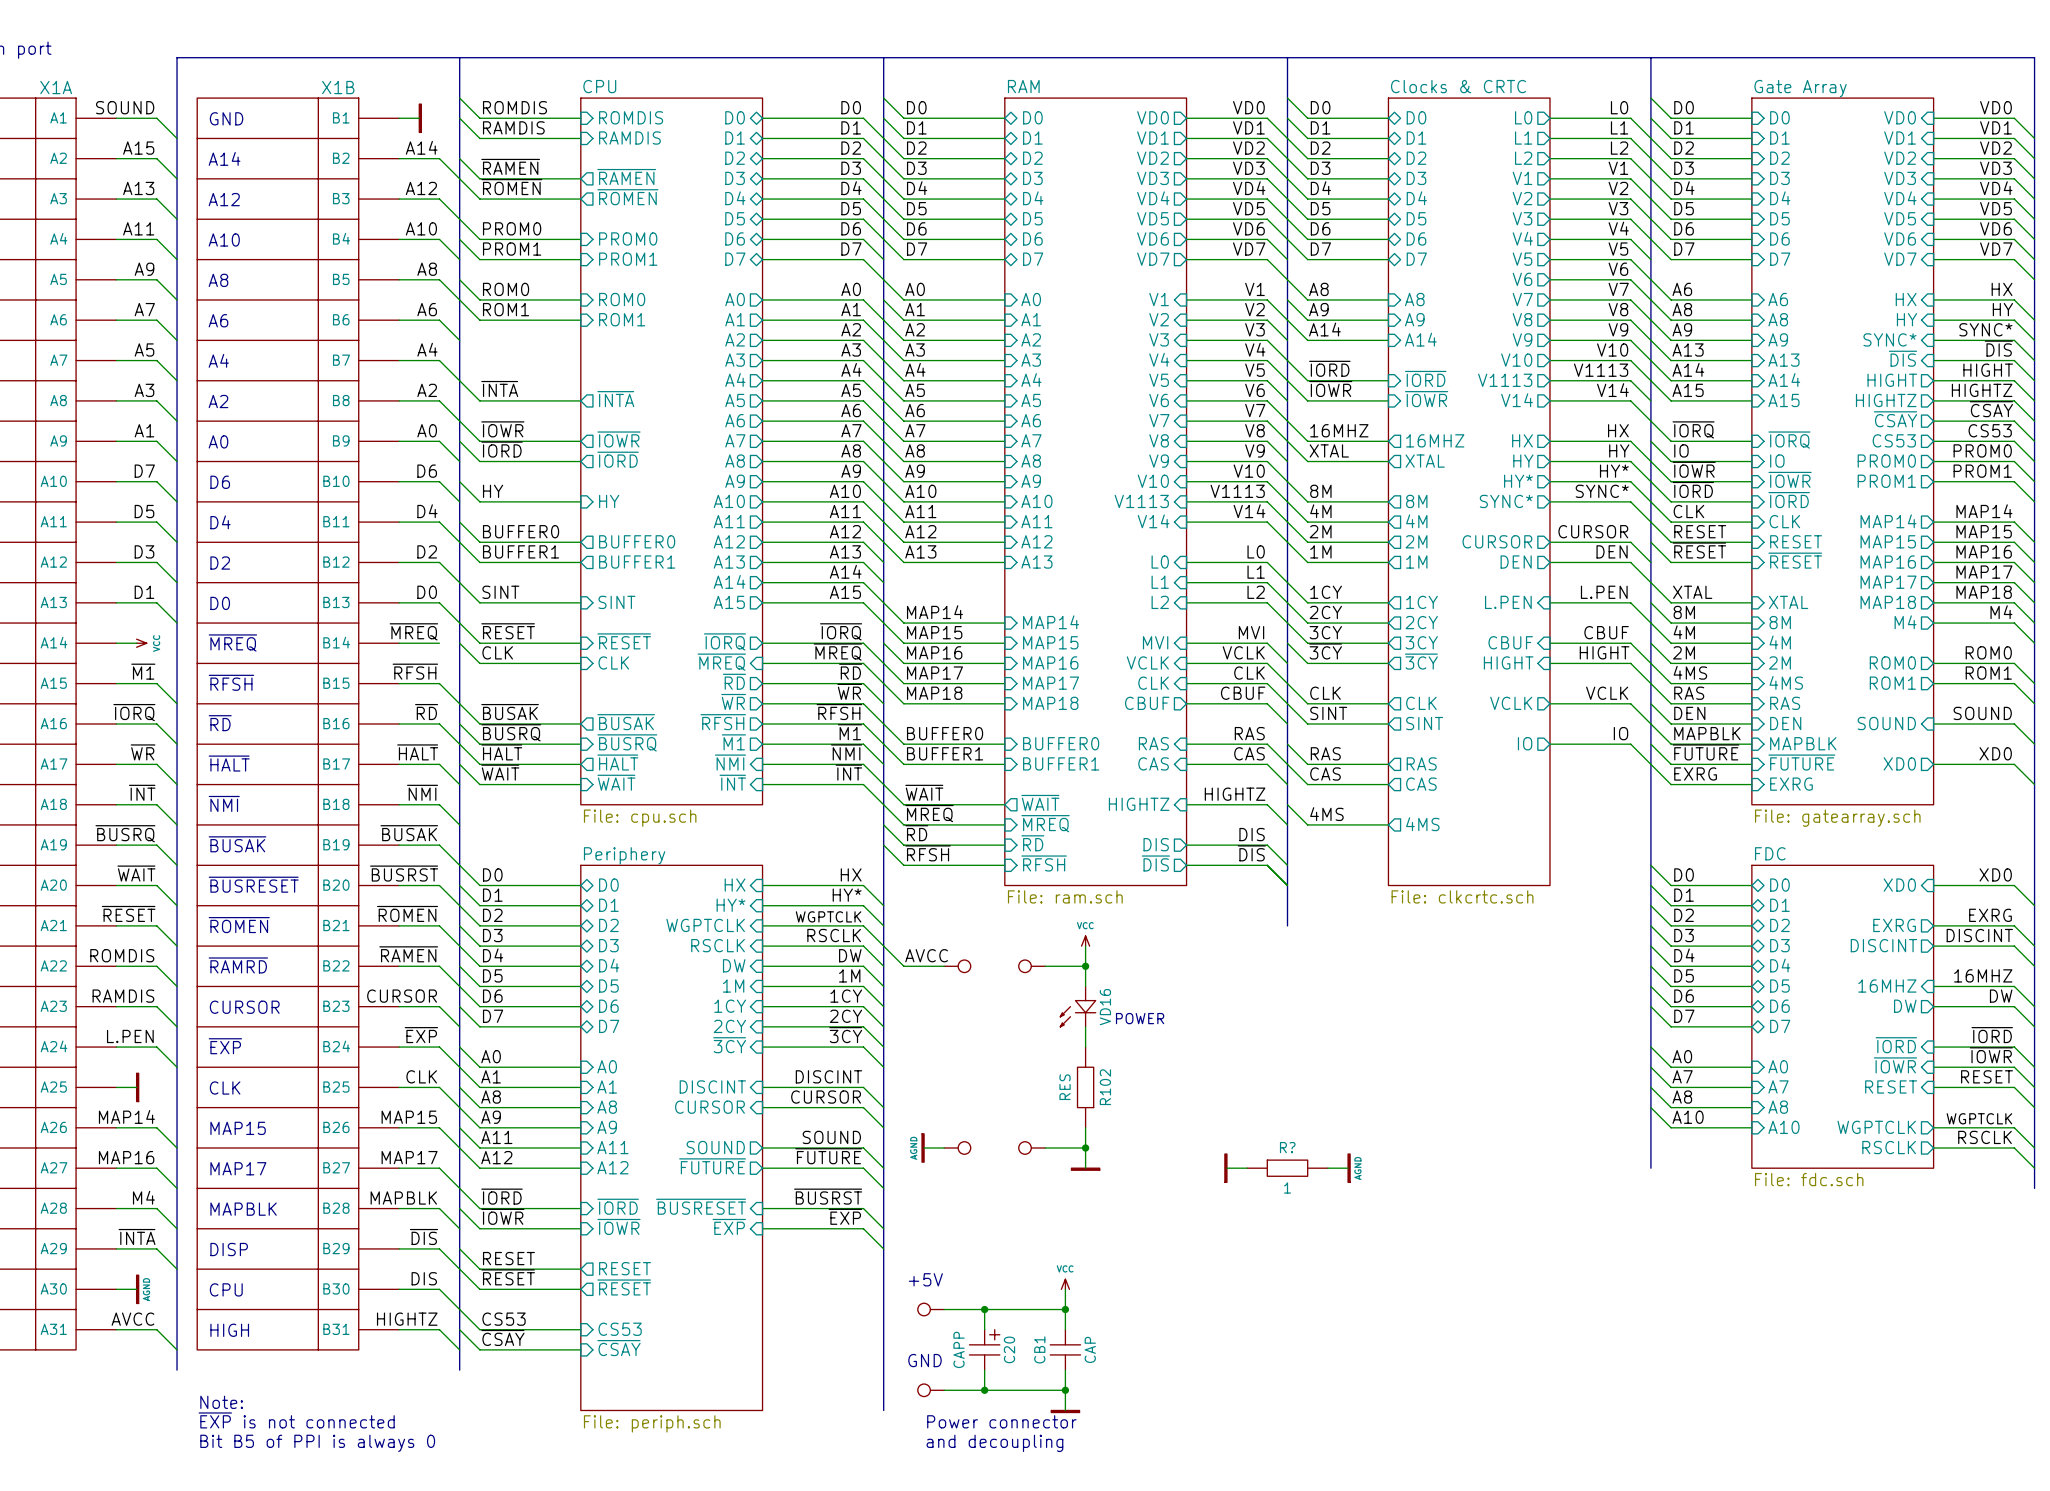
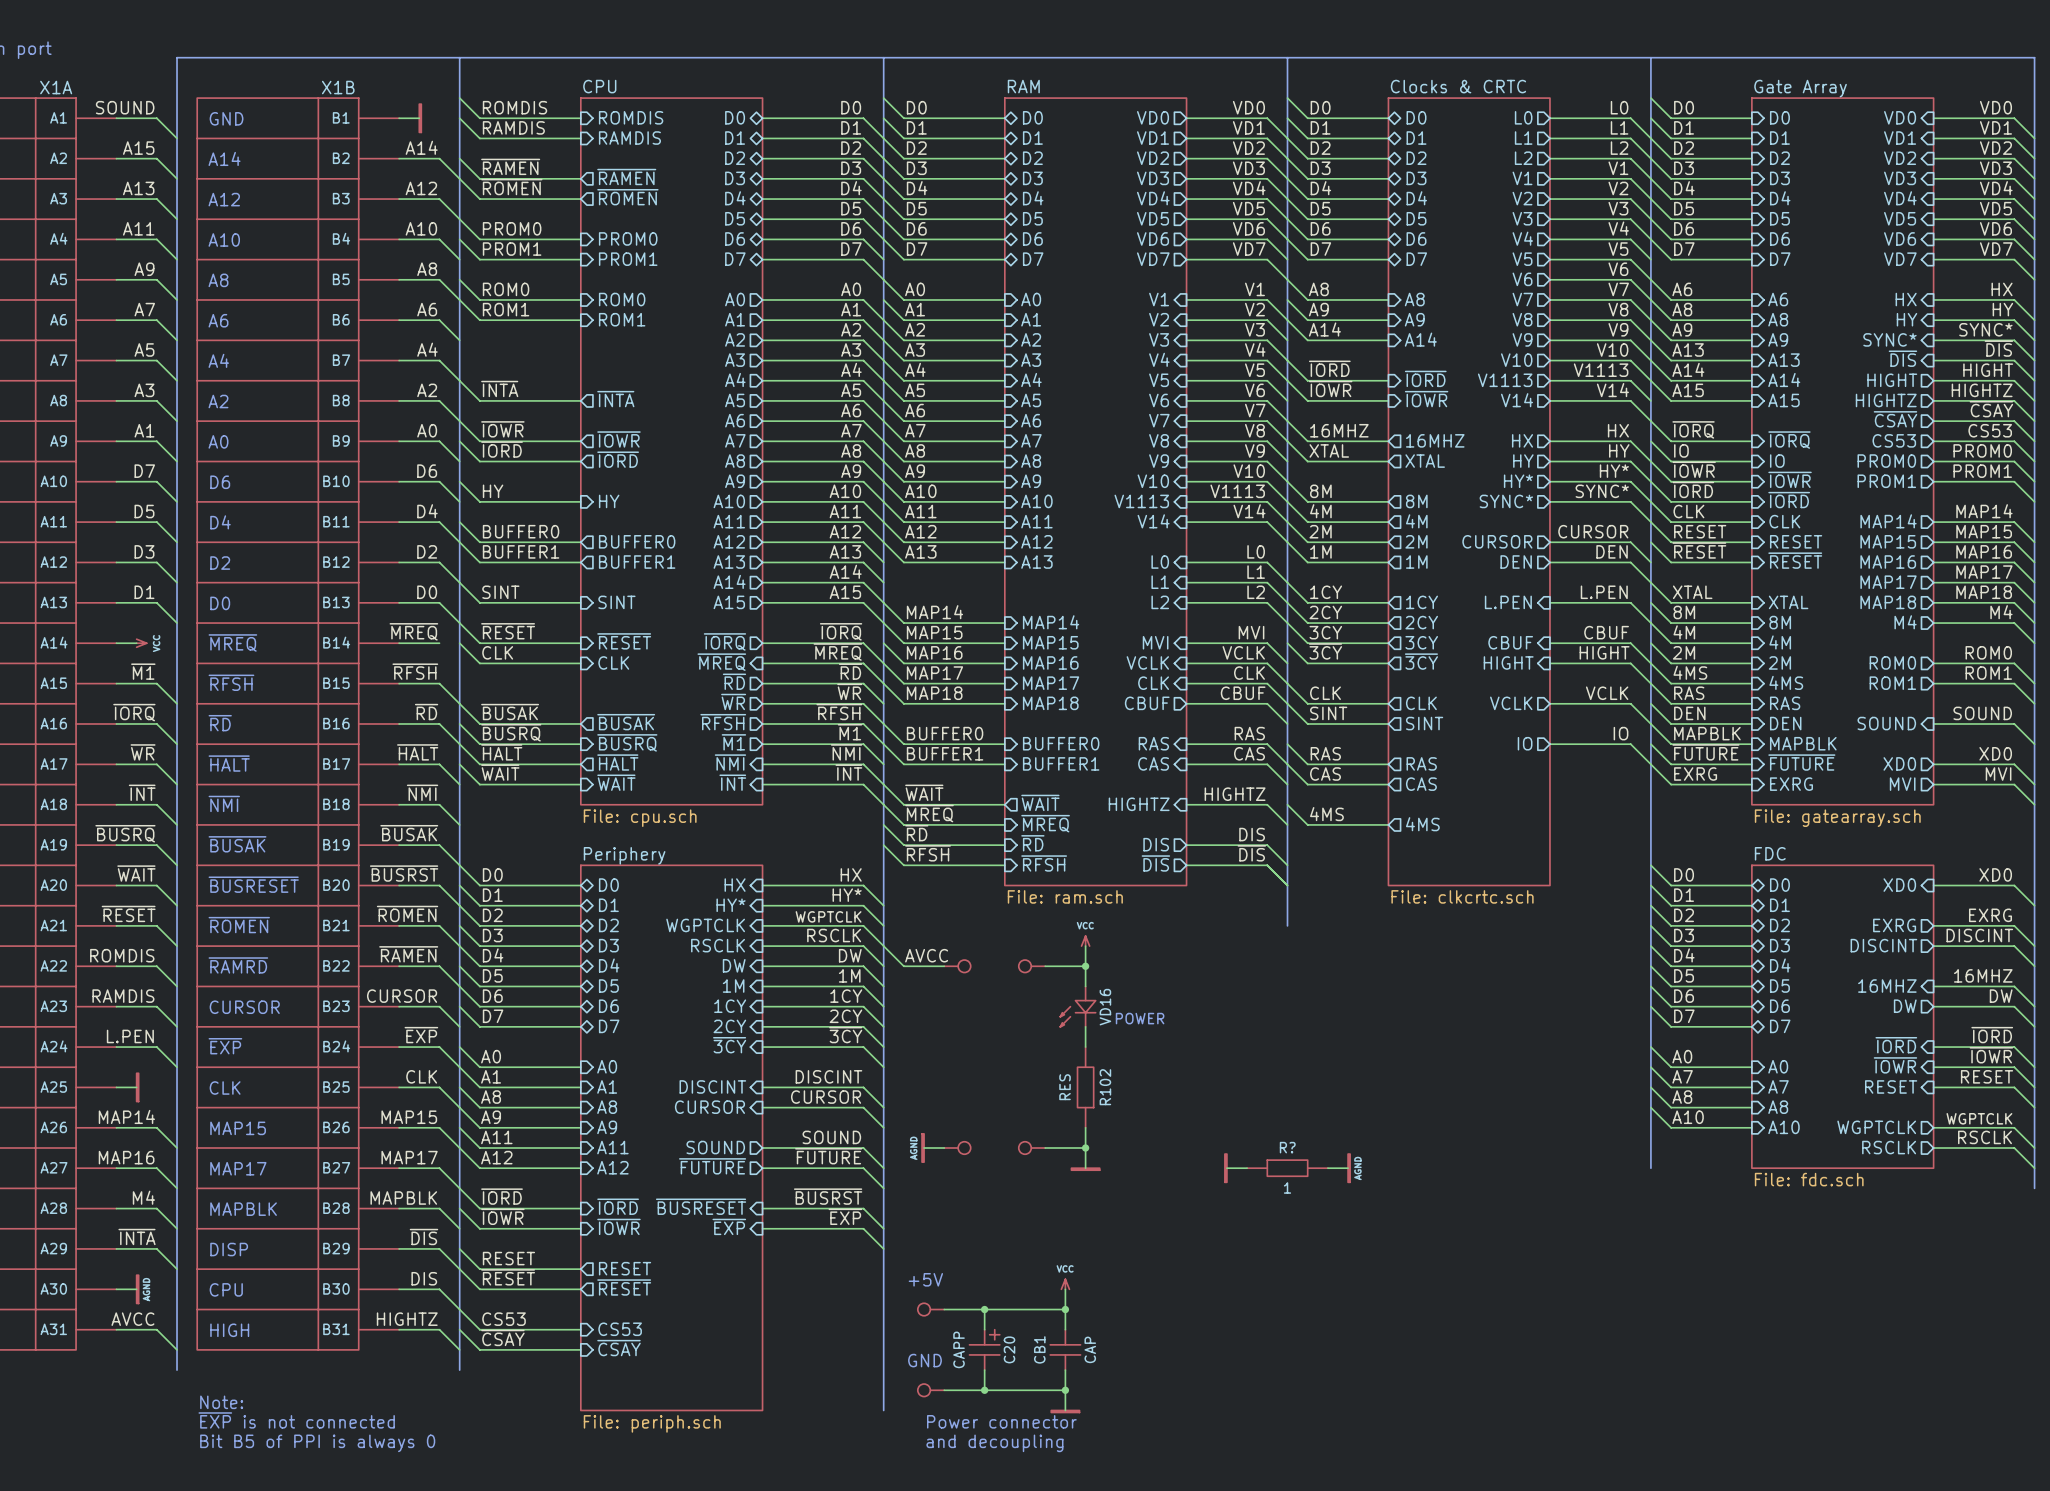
label: none -> MVI (1998, 773)
sheet pin: none -> MVI (1902, 784)
wire: none -> (1933, 784) (2014, 784) (2034, 804)

